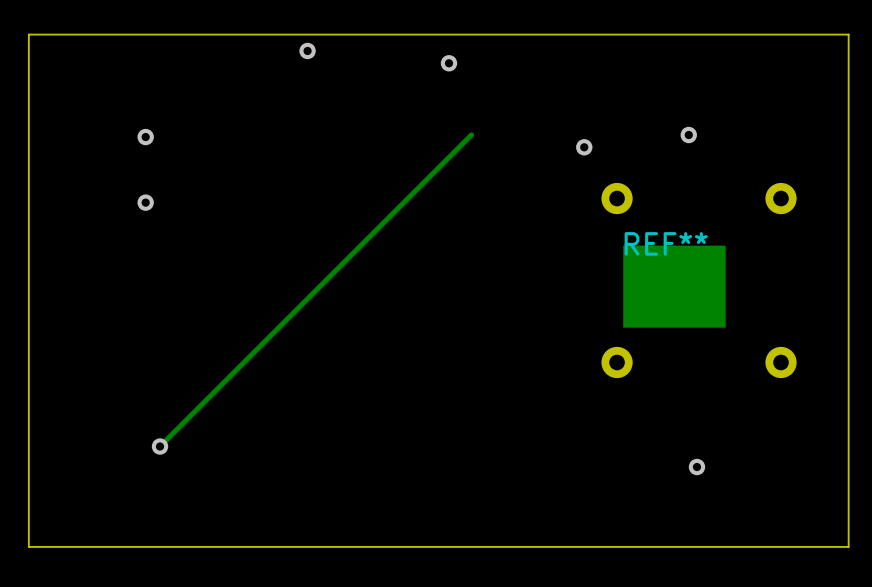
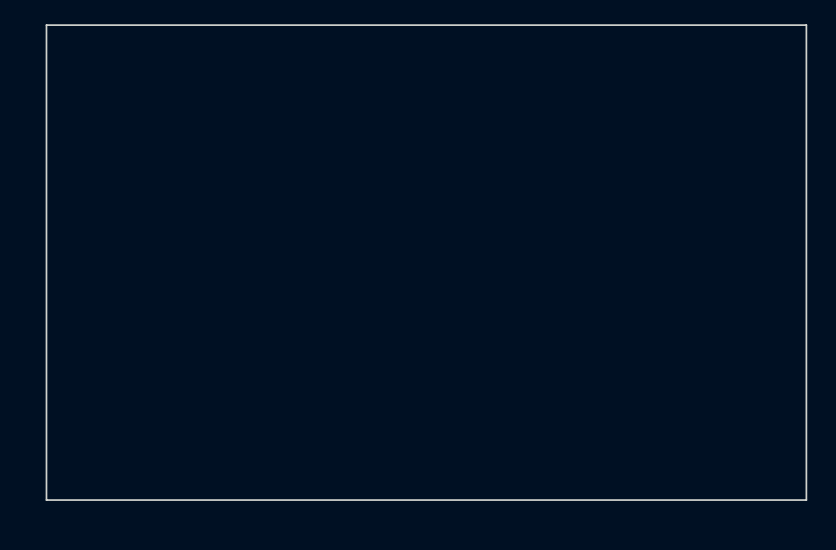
via: (307, 50) -> none
via: (448, 63) -> none
track: (471, 135) (160, 446) -> none
via: (688, 135) -> none
via: (145, 137) -> none
via: (584, 147) -> none
via: (145, 202) -> none
REF**: (699, 280) -> none
via: (160, 446) -> none
via: (696, 467) -> none

